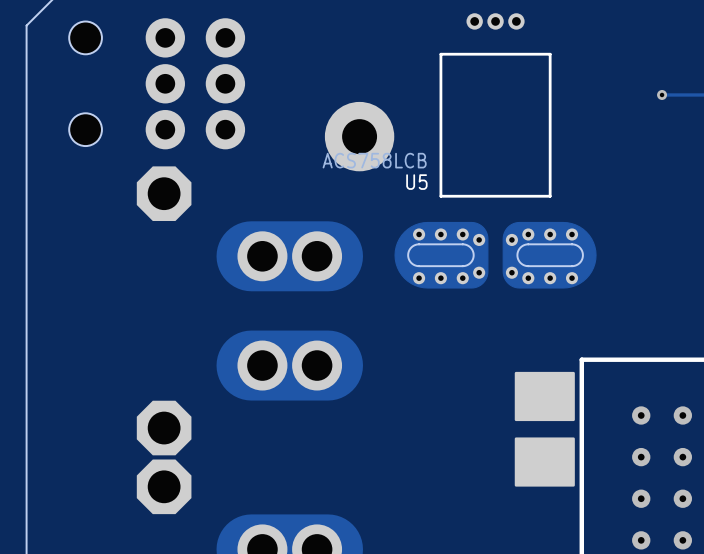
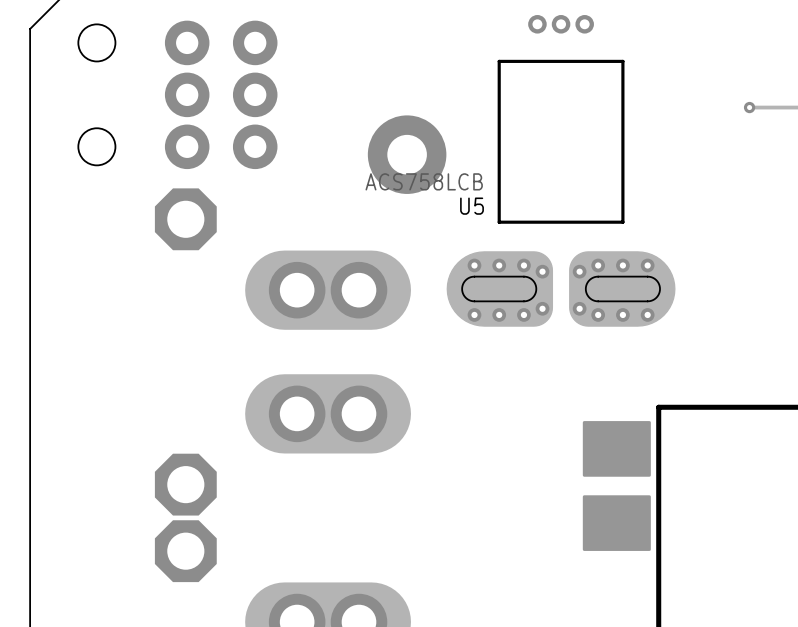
via: (641, 415) -> none
via: (682, 415) -> none
via: (641, 457) -> none
via: (682, 457) -> none
via: (641, 498) -> none
via: (682, 498) -> none
via: (641, 540) -> none
via: (682, 540) -> none

